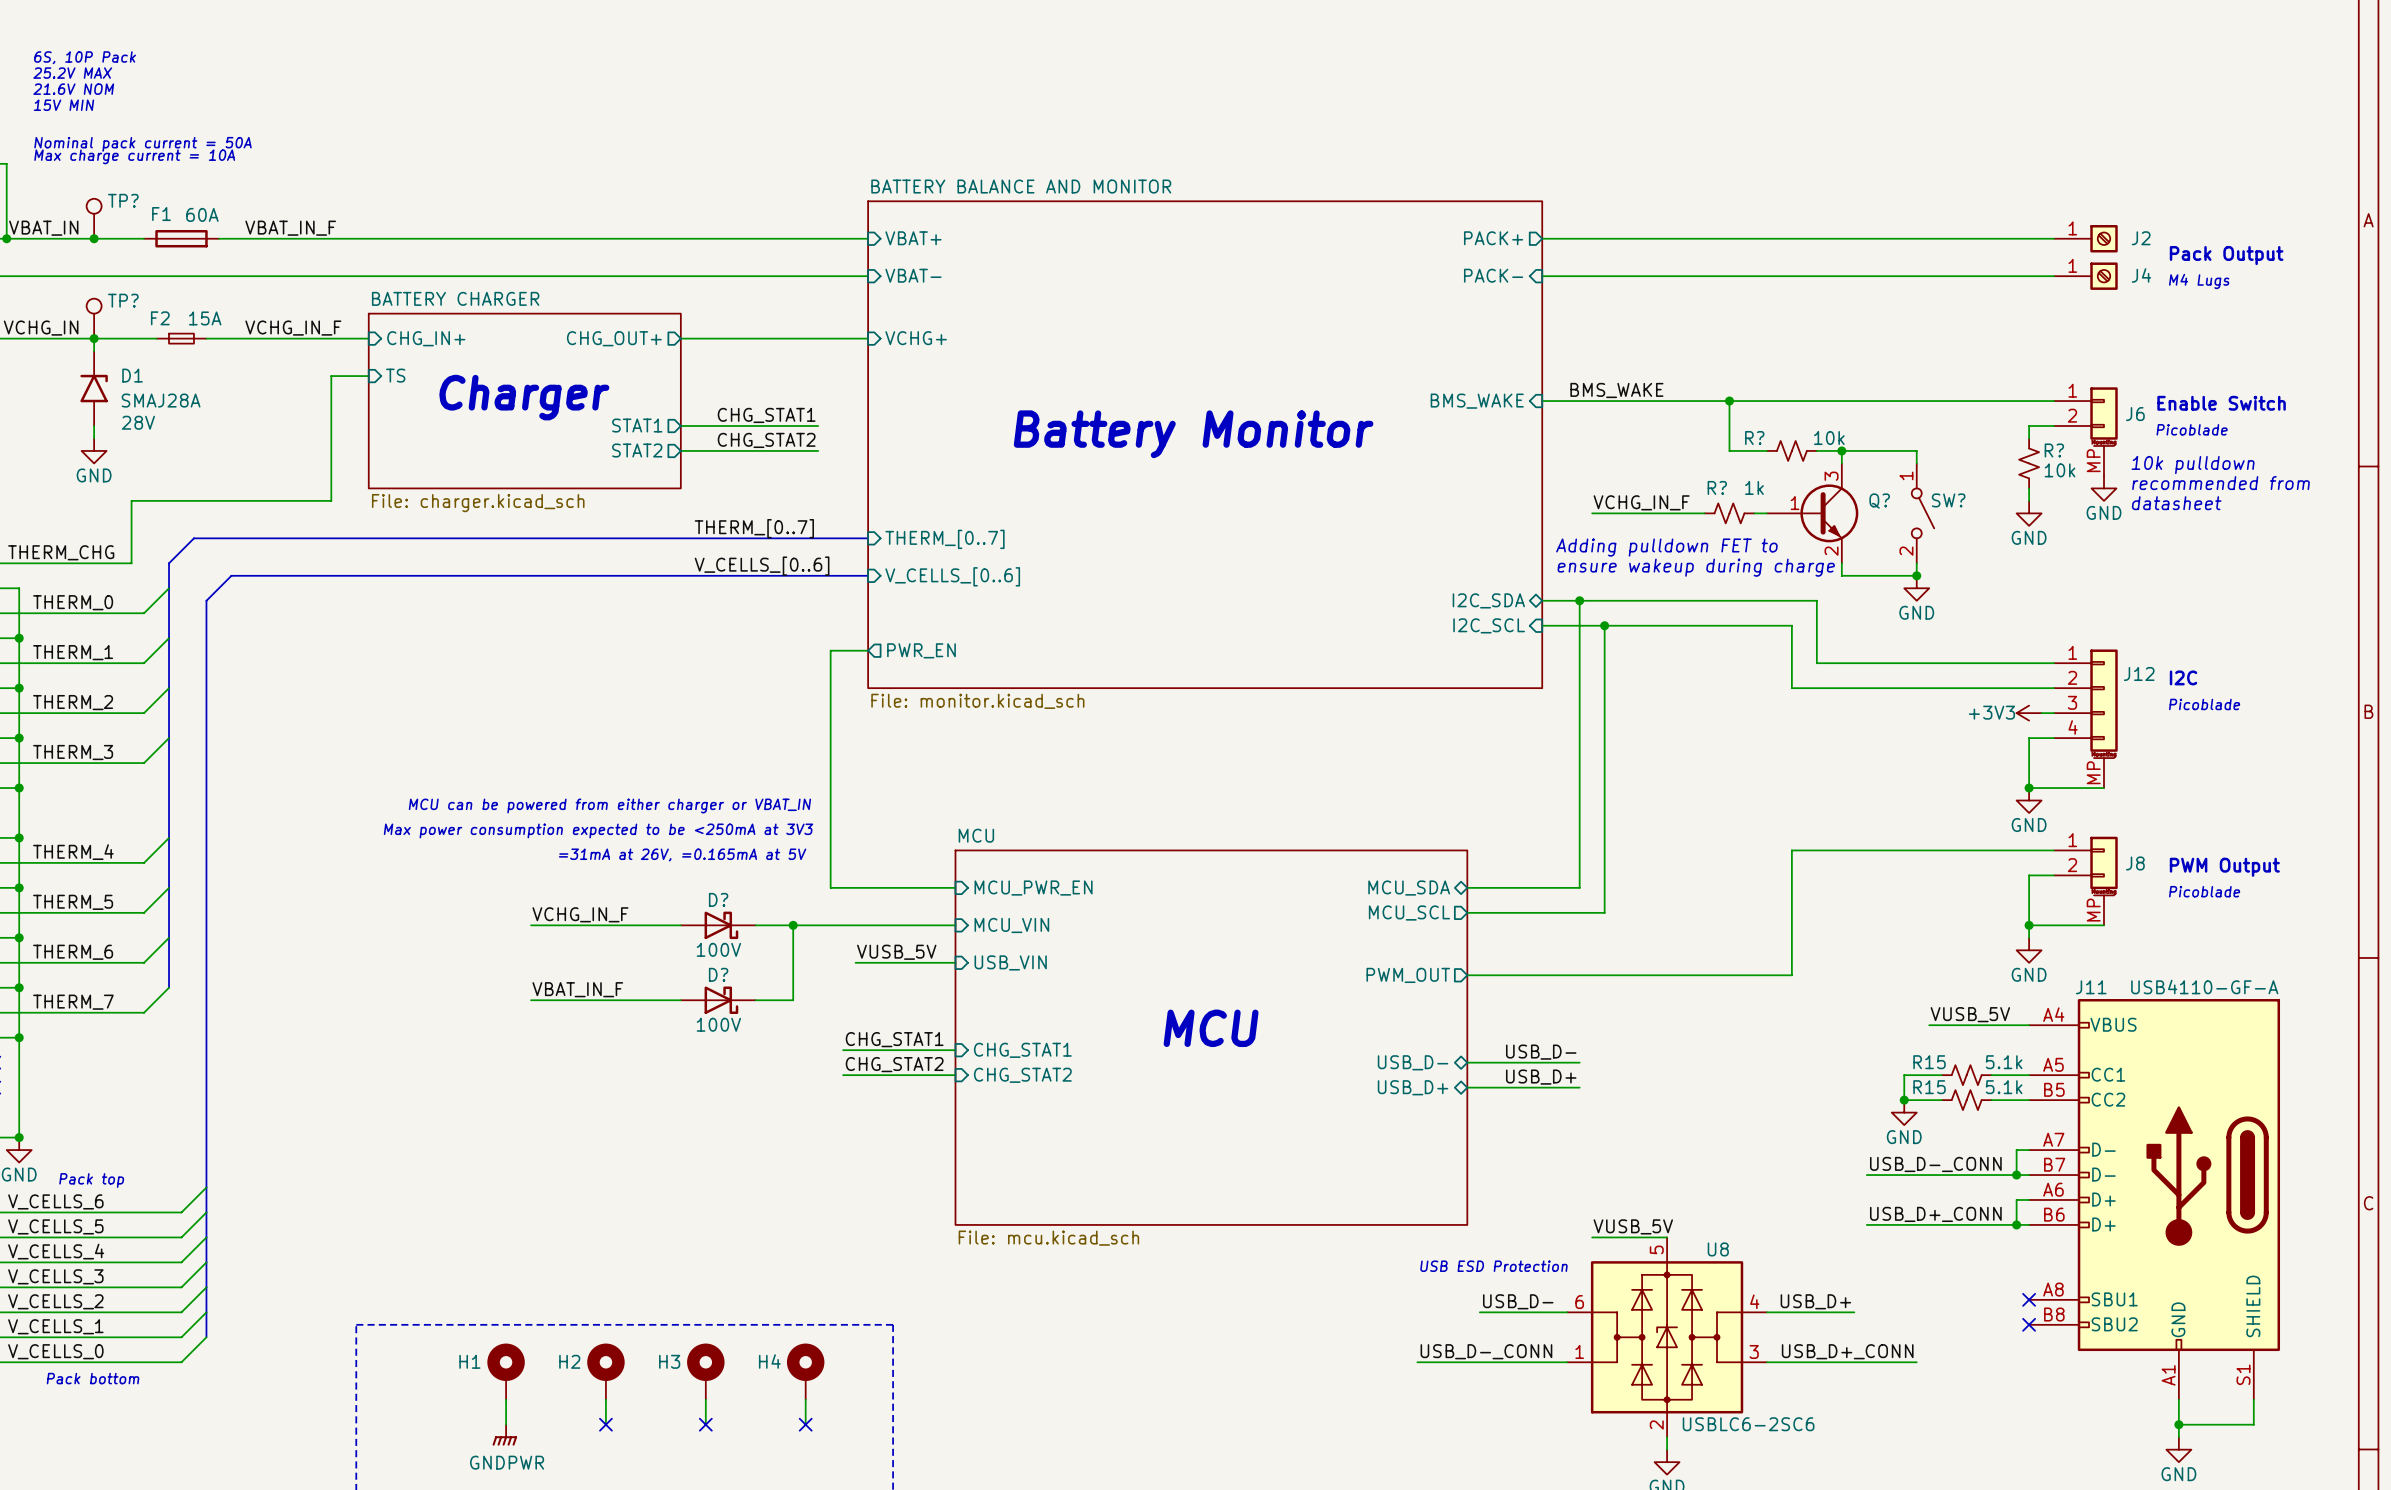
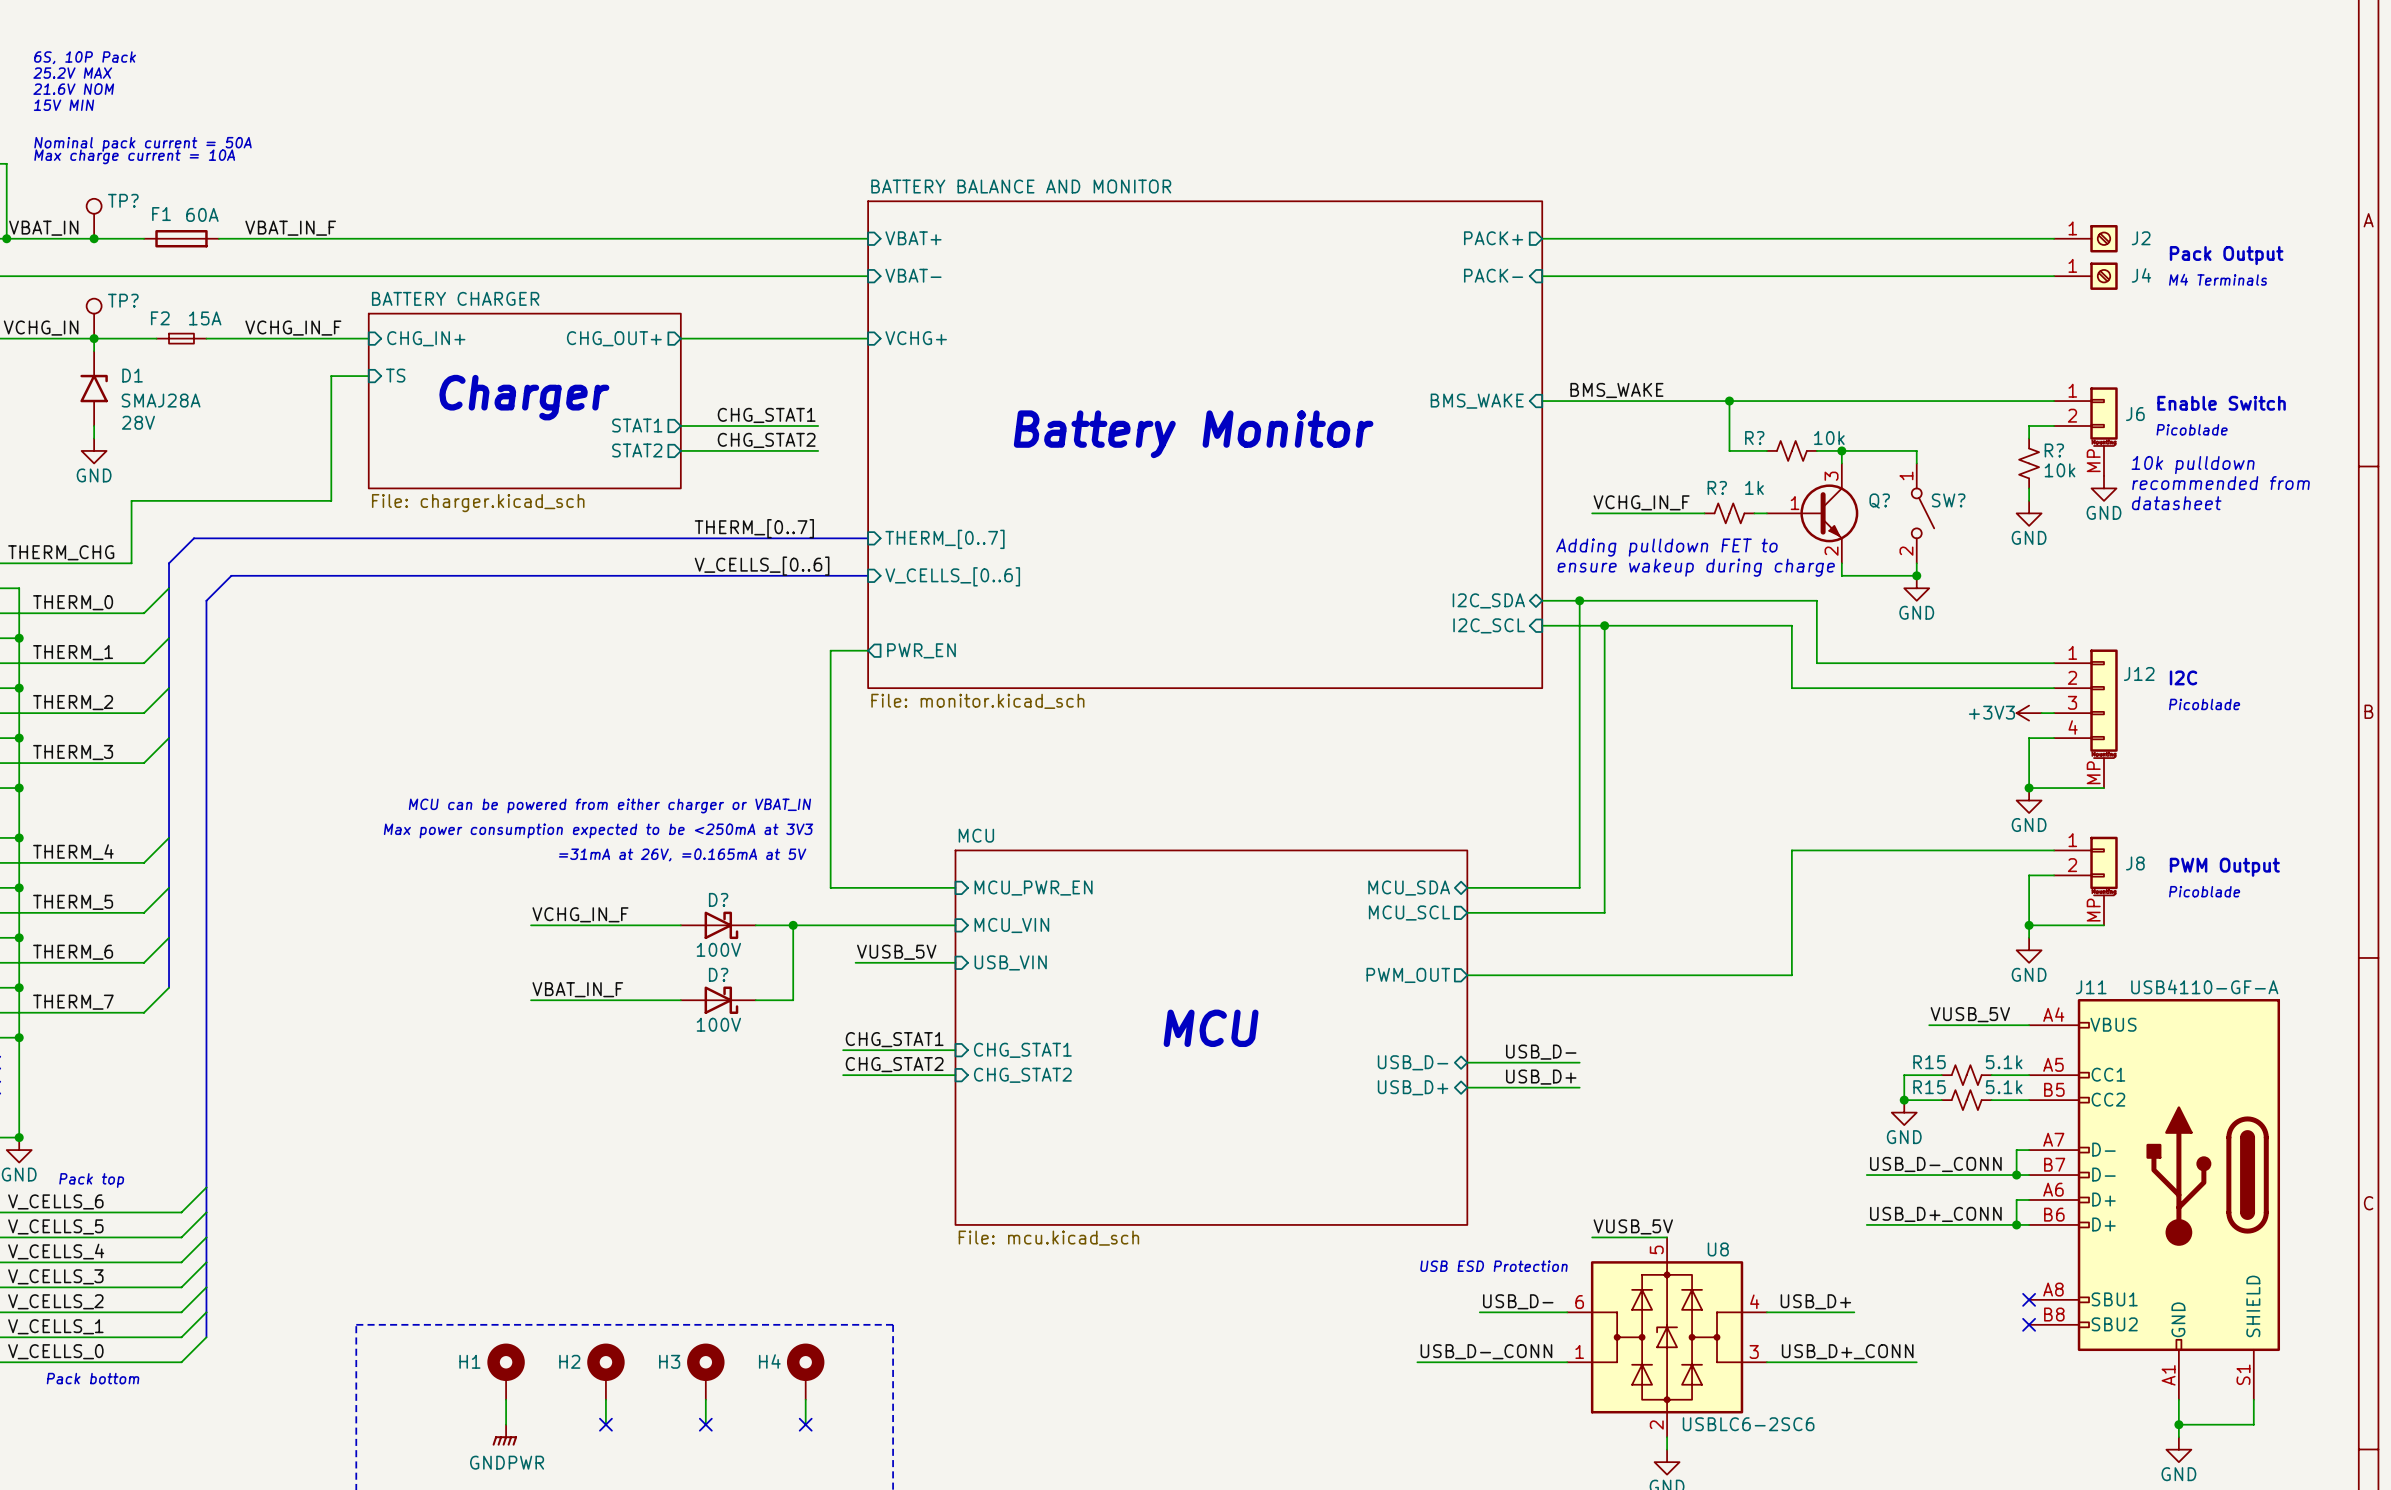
text: M4 Lugs (2199, 281) -> M4 Terminals (2217, 279)

